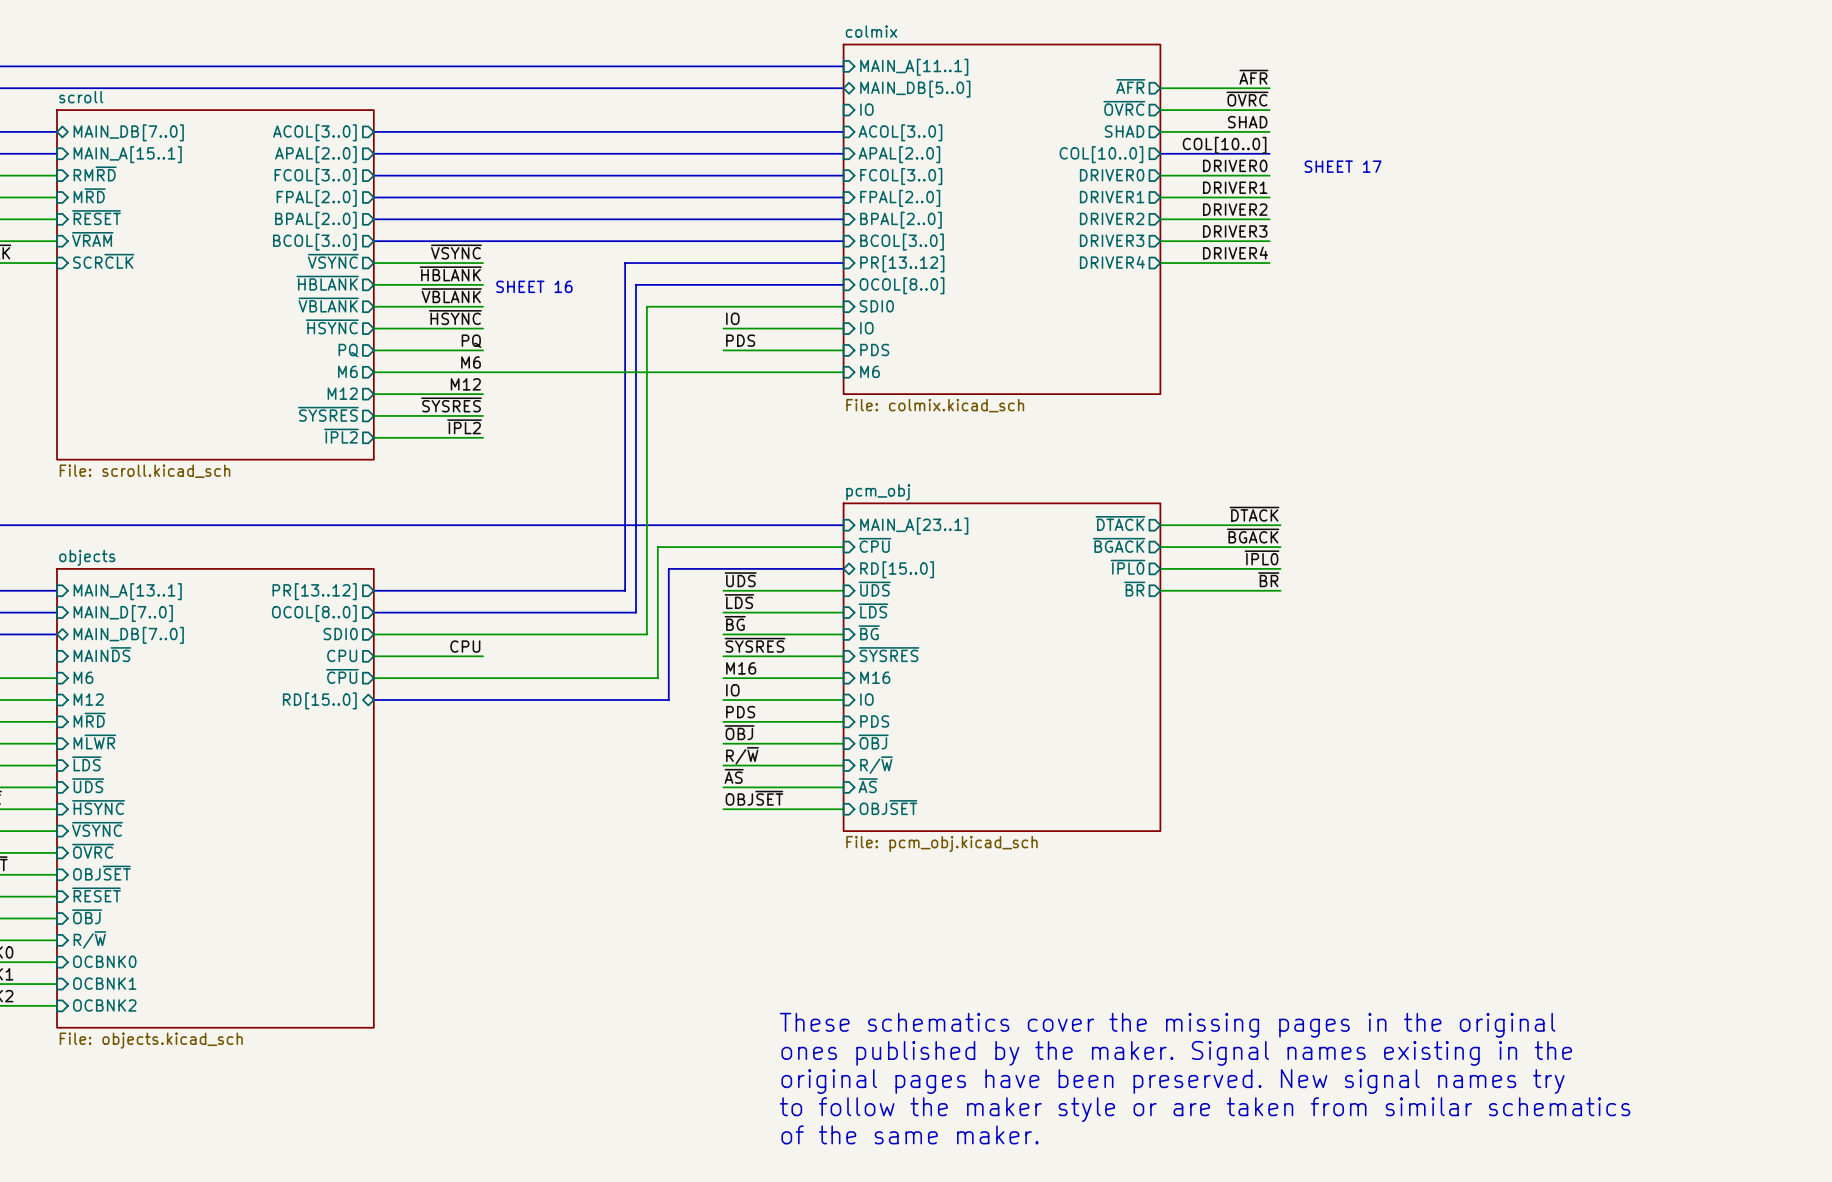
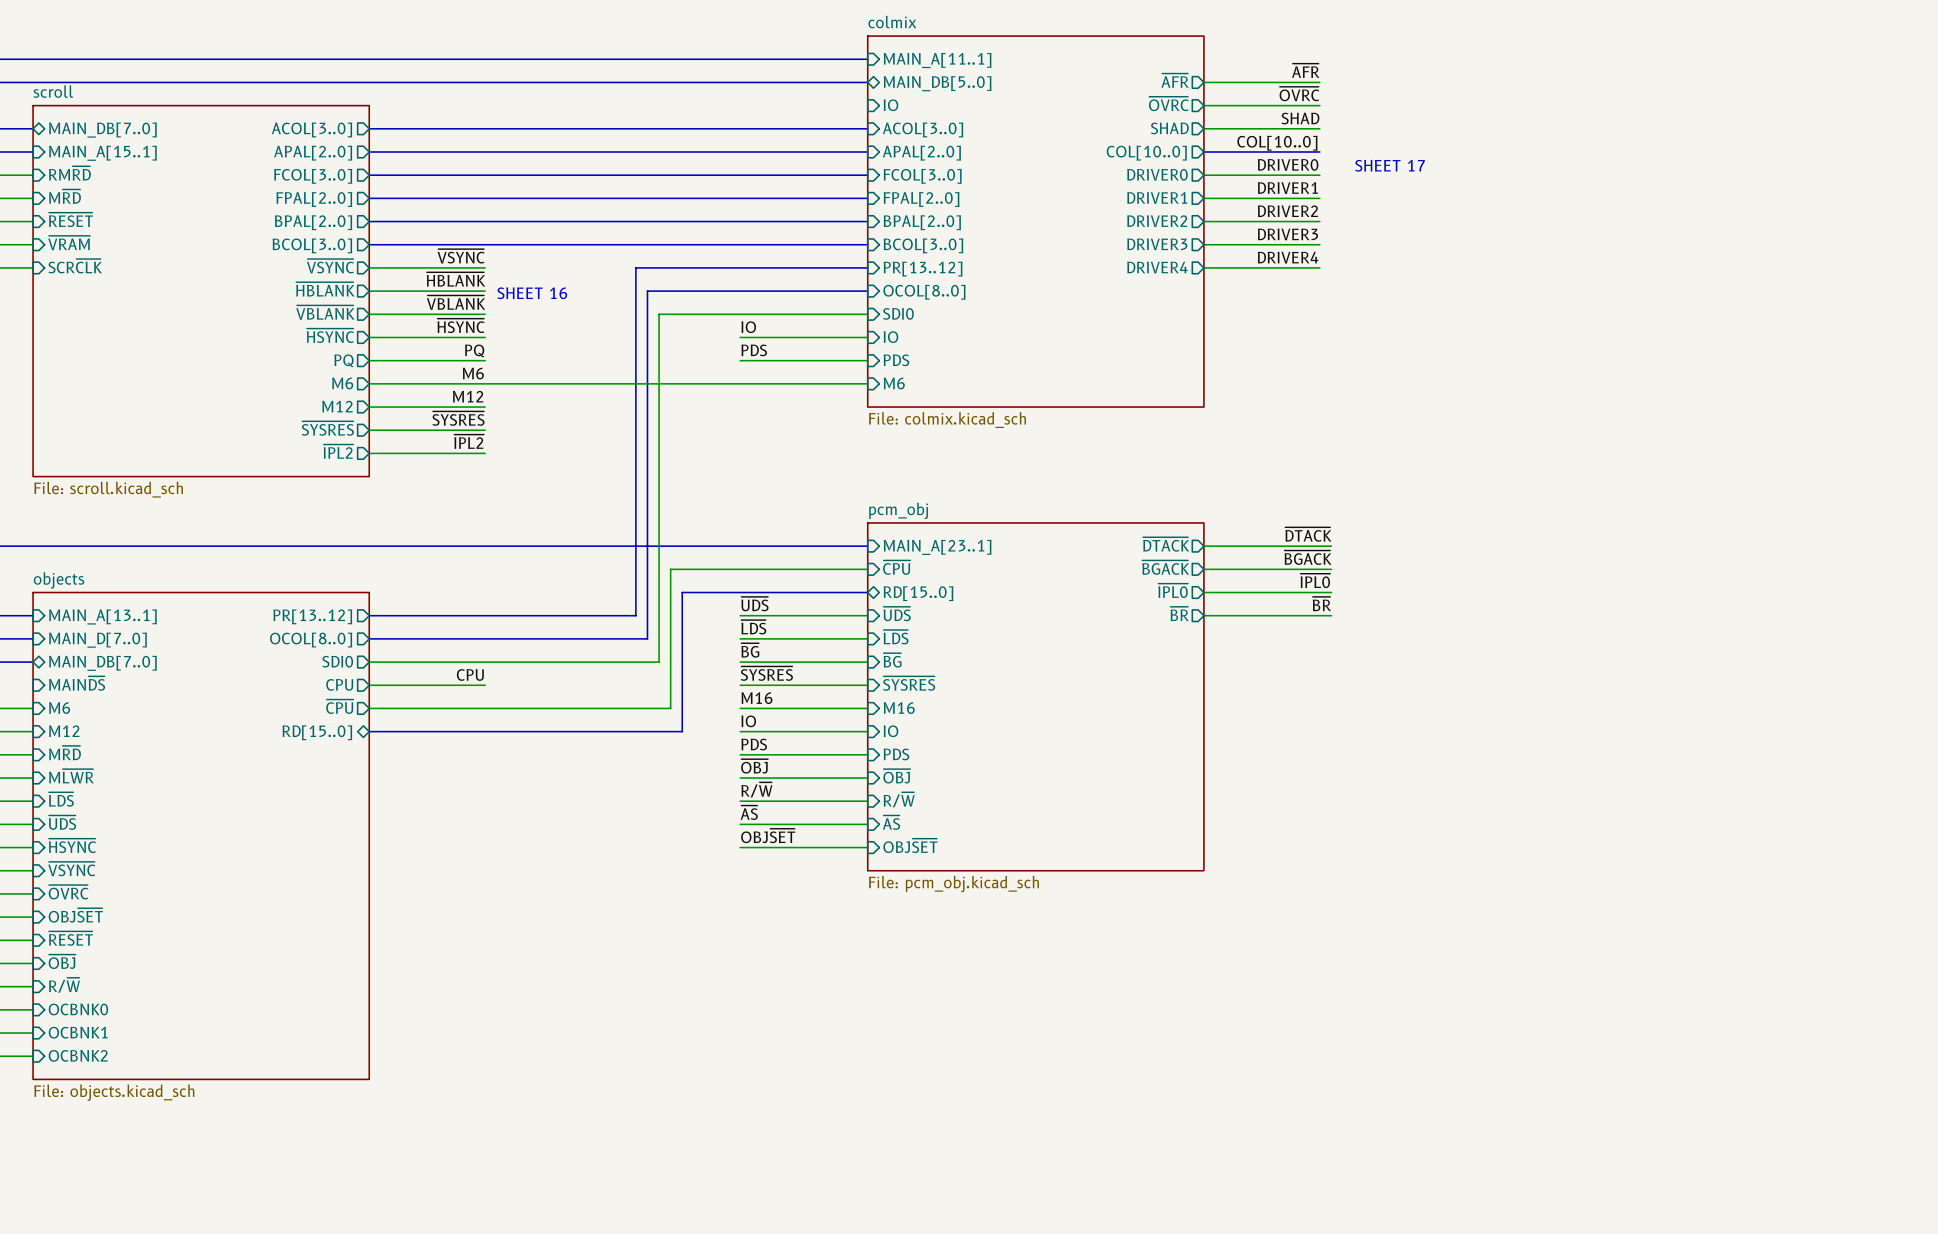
text: These schematics cover the missing pages in the original (1167, 1025) -> none
text: ones published by the maker. Signal names existing in the (1176, 1053) -> none
text: original pages have been preserved. New signal names try (1173, 1081) -> none
text: to follow the maker style or are taken from similar schematics (1205, 1109) -> none
text: of the same maker. (909, 1134) -> none

